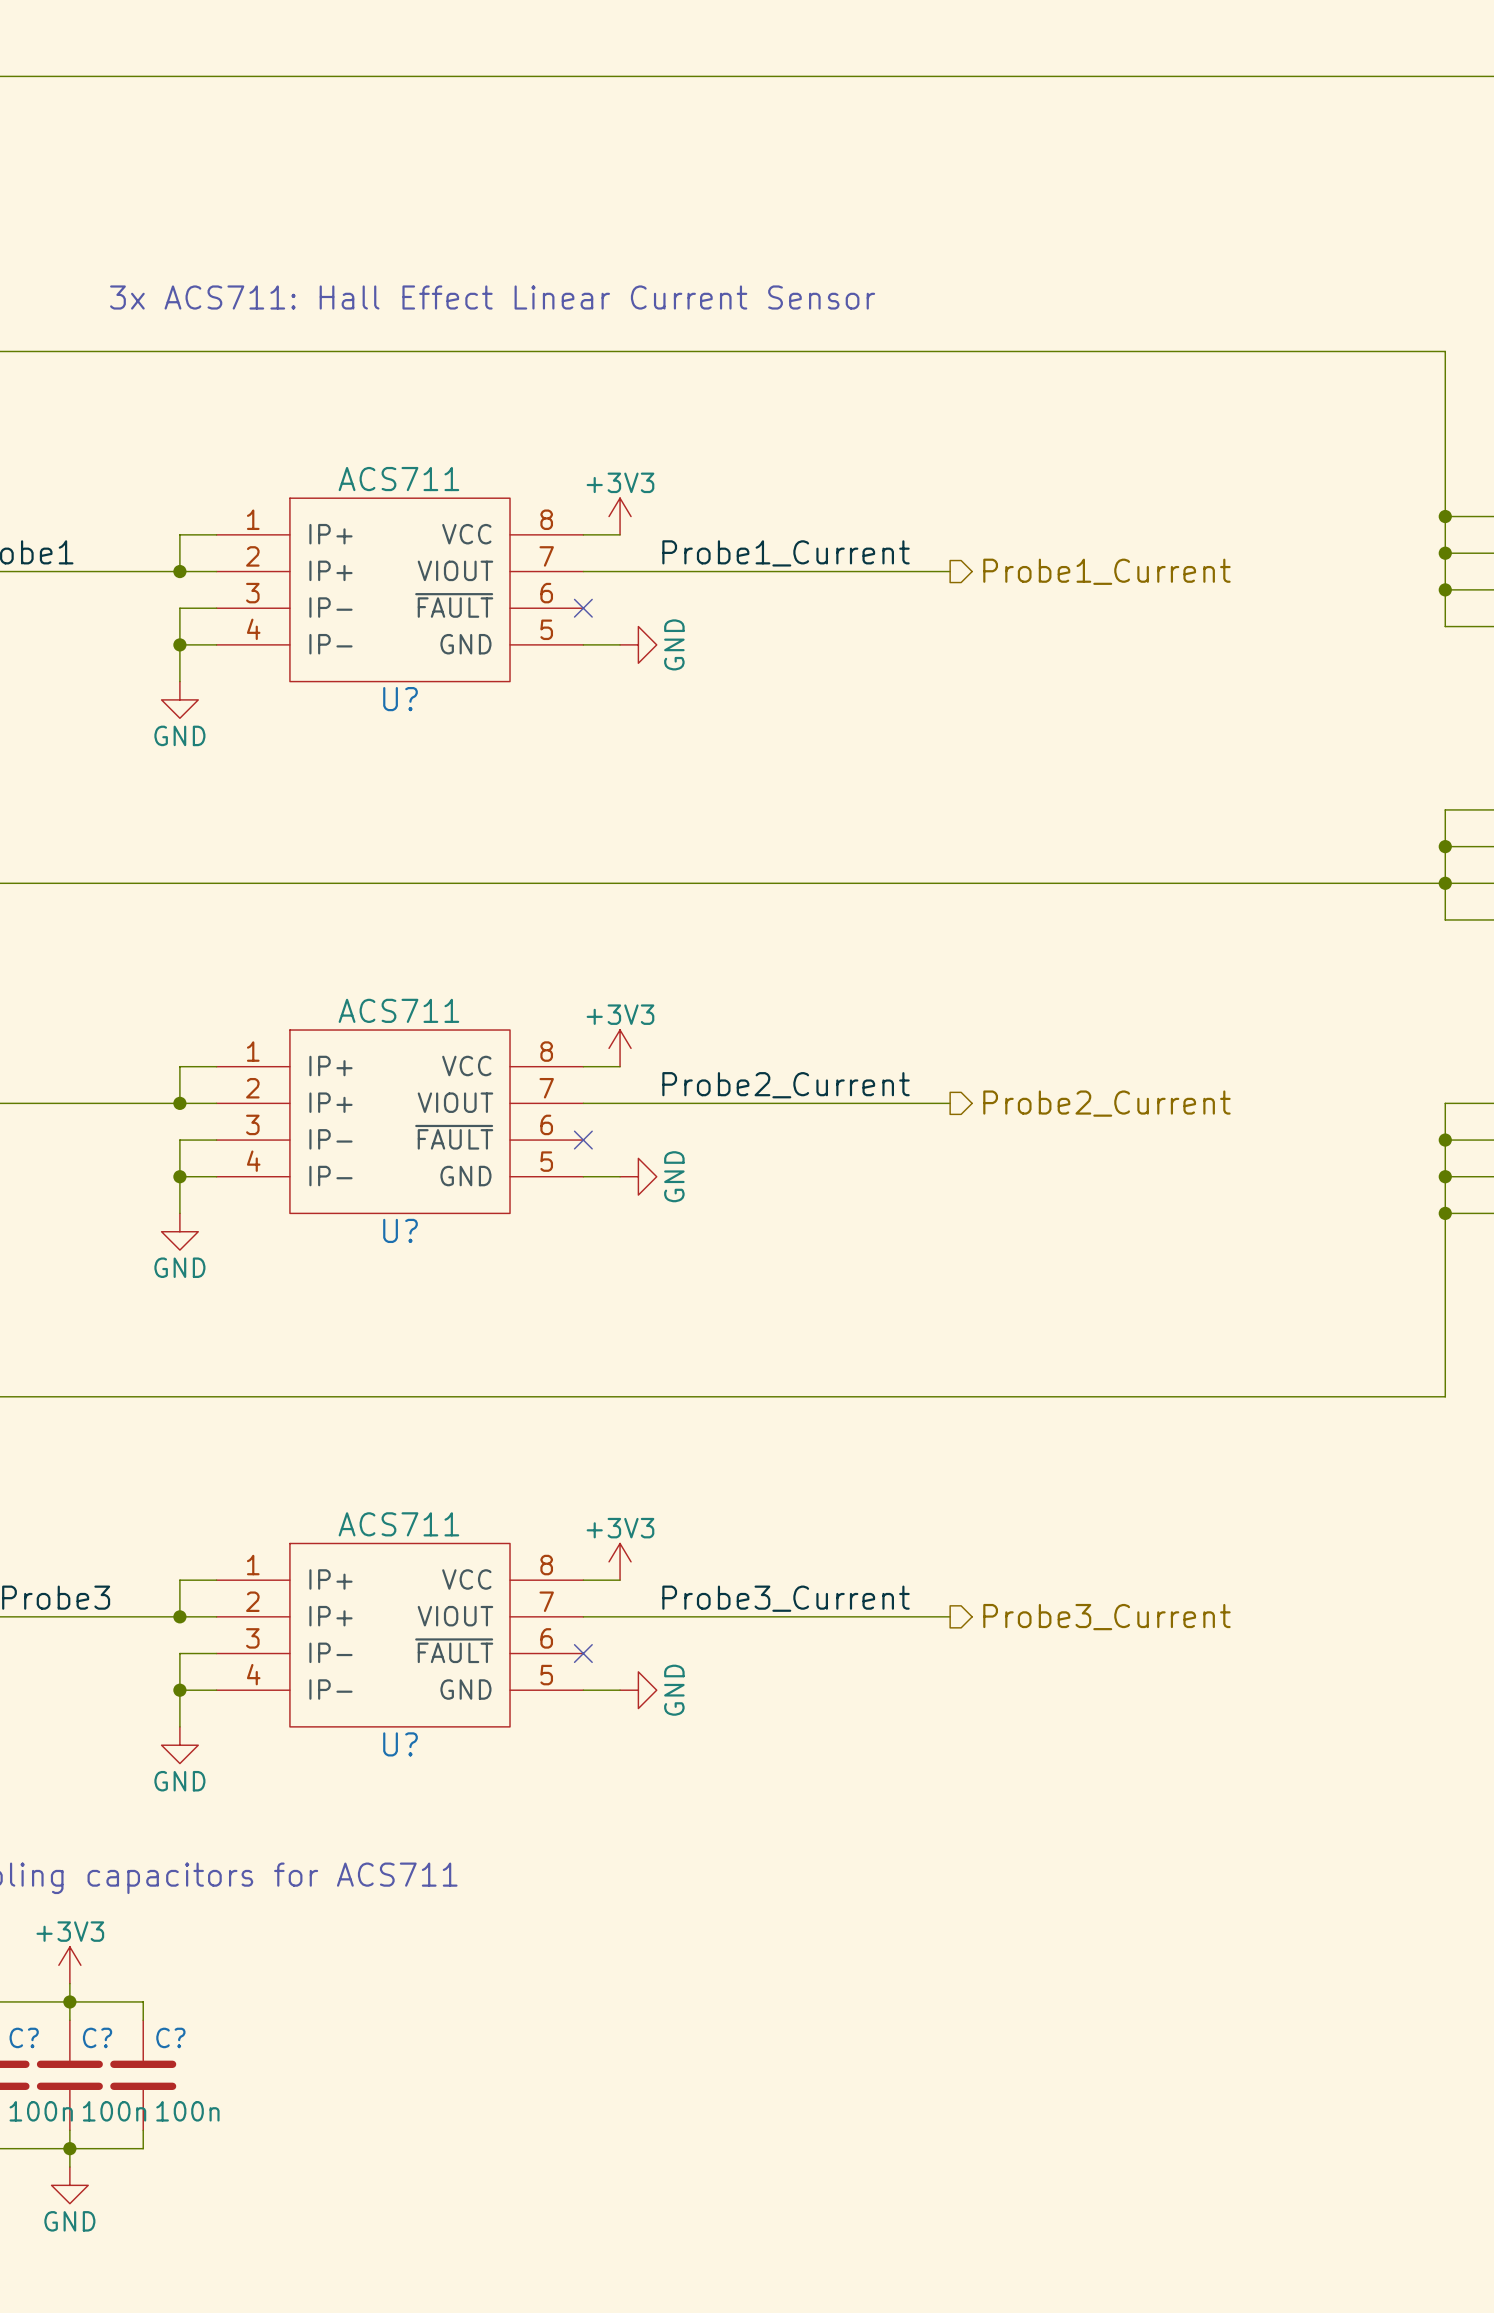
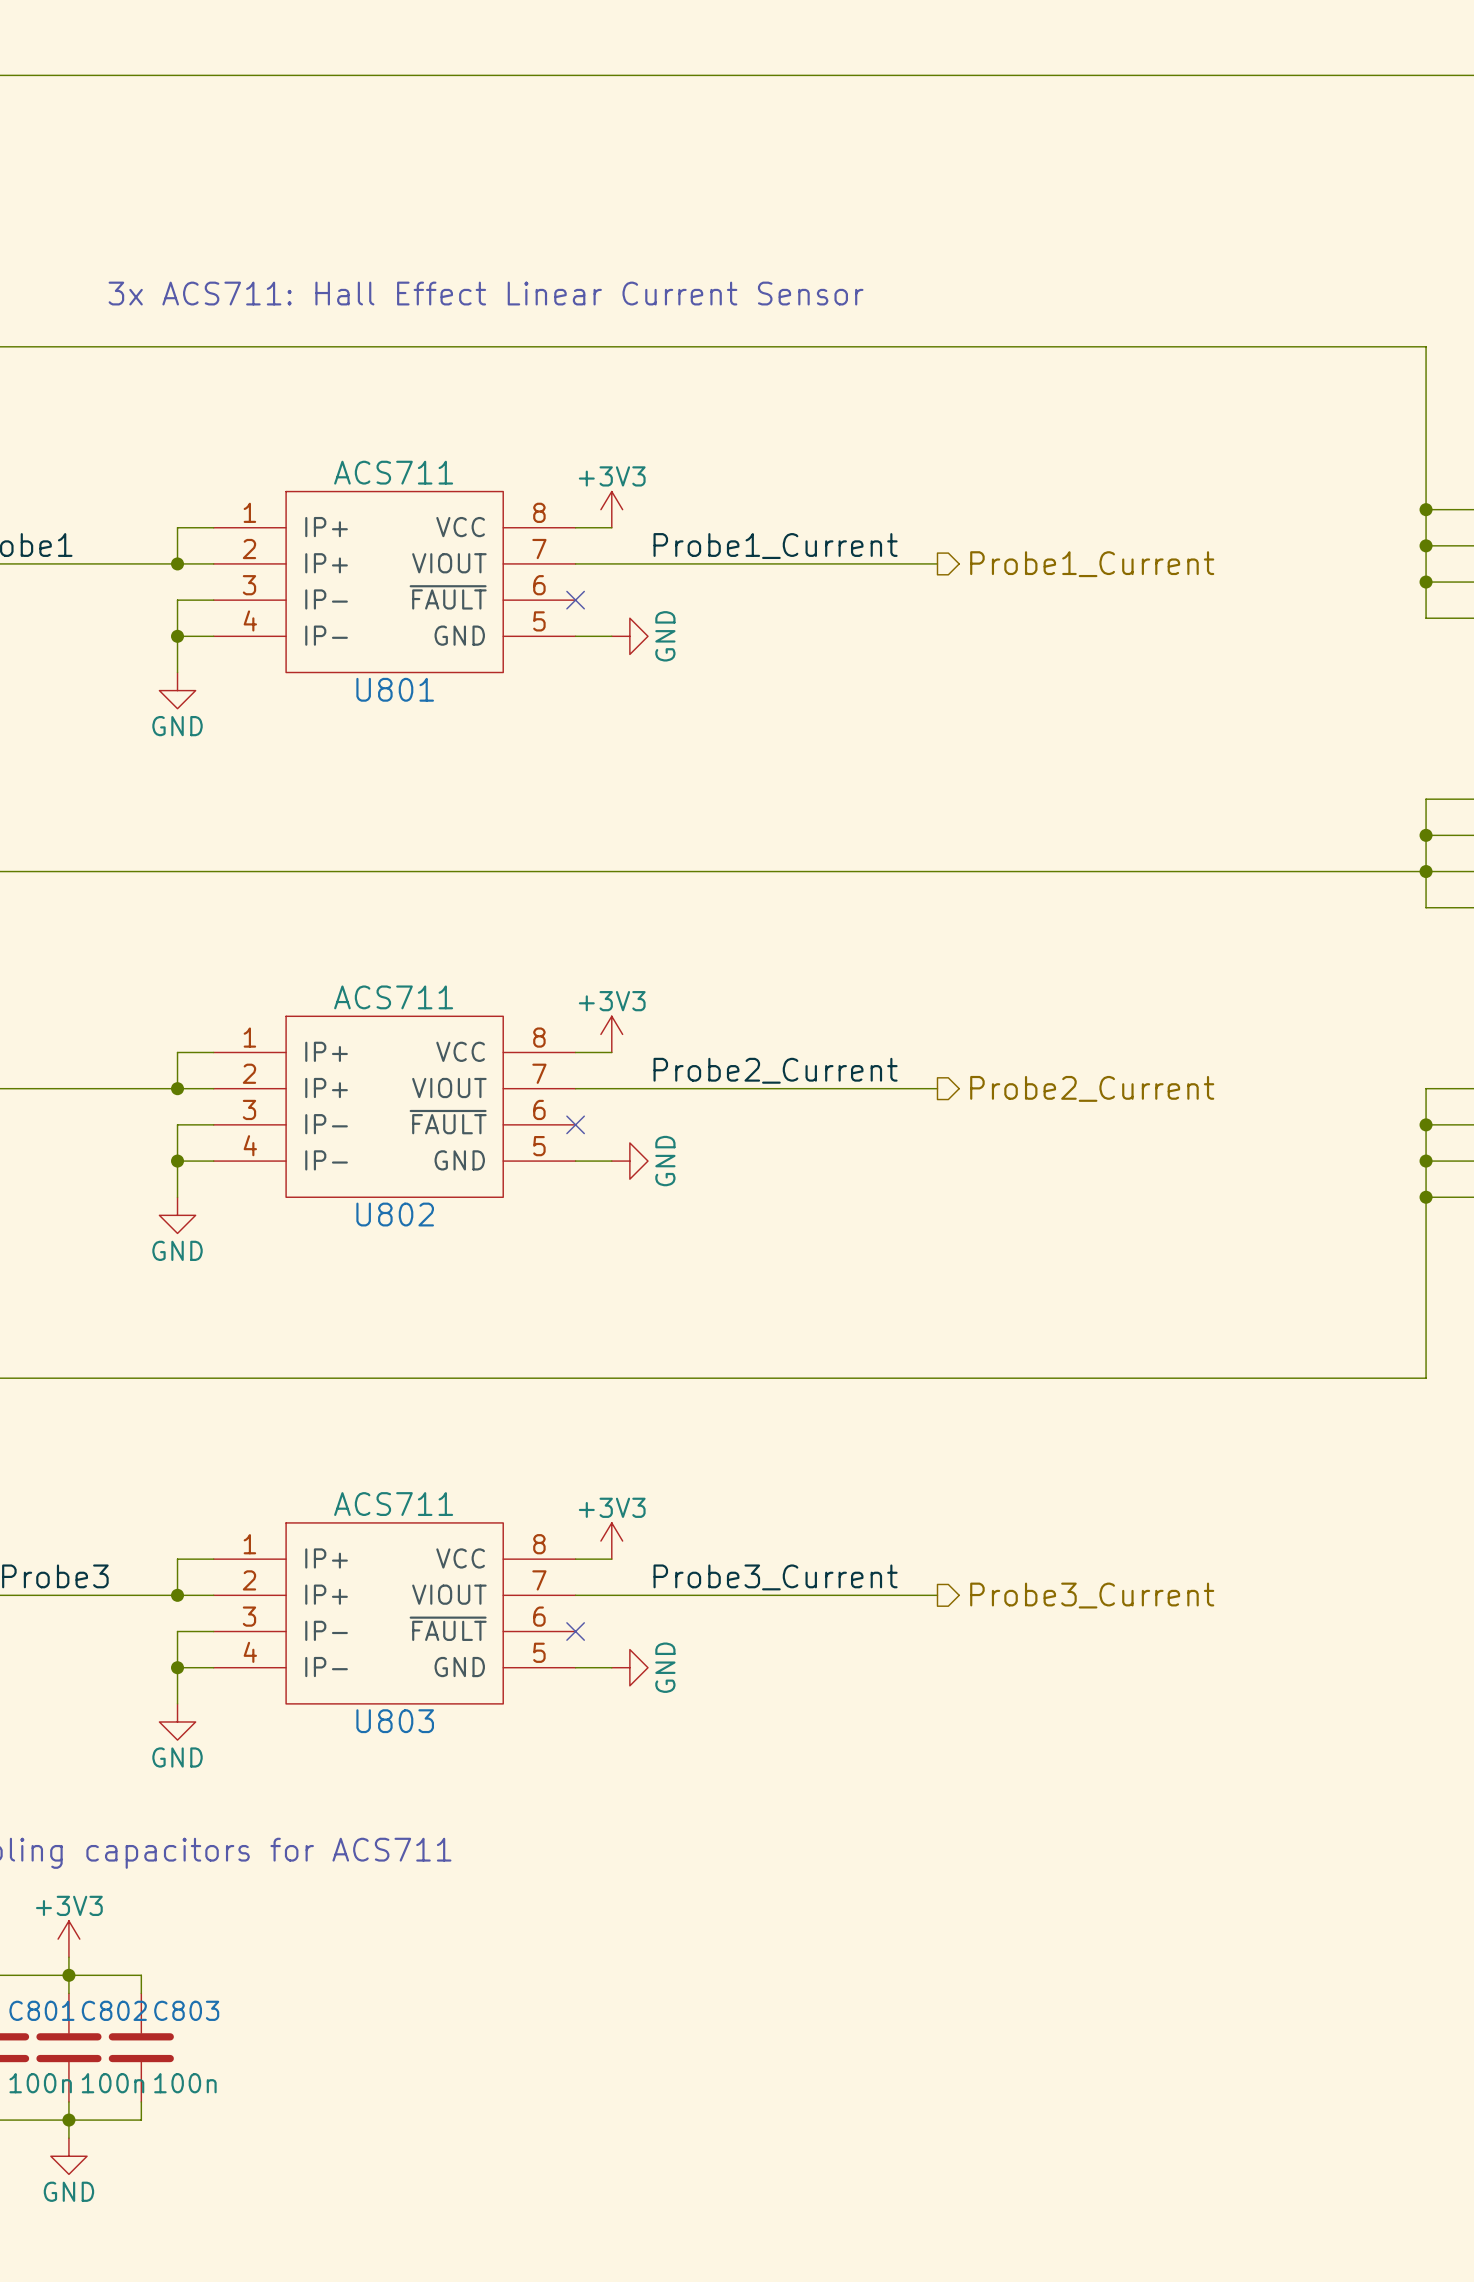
U? name: U? (400, 699) -> U801 (395, 689)
U? name: U? (400, 1230) -> U802 (395, 1214)
U? name: U? (400, 1744) -> U803 (395, 1721)
C? name: C? (24, 2037) -> C801 (41, 2010)
C? name: C? (97, 2037) -> C802 (114, 2010)
C? name: C? (170, 2037) -> C803 (186, 2010)

